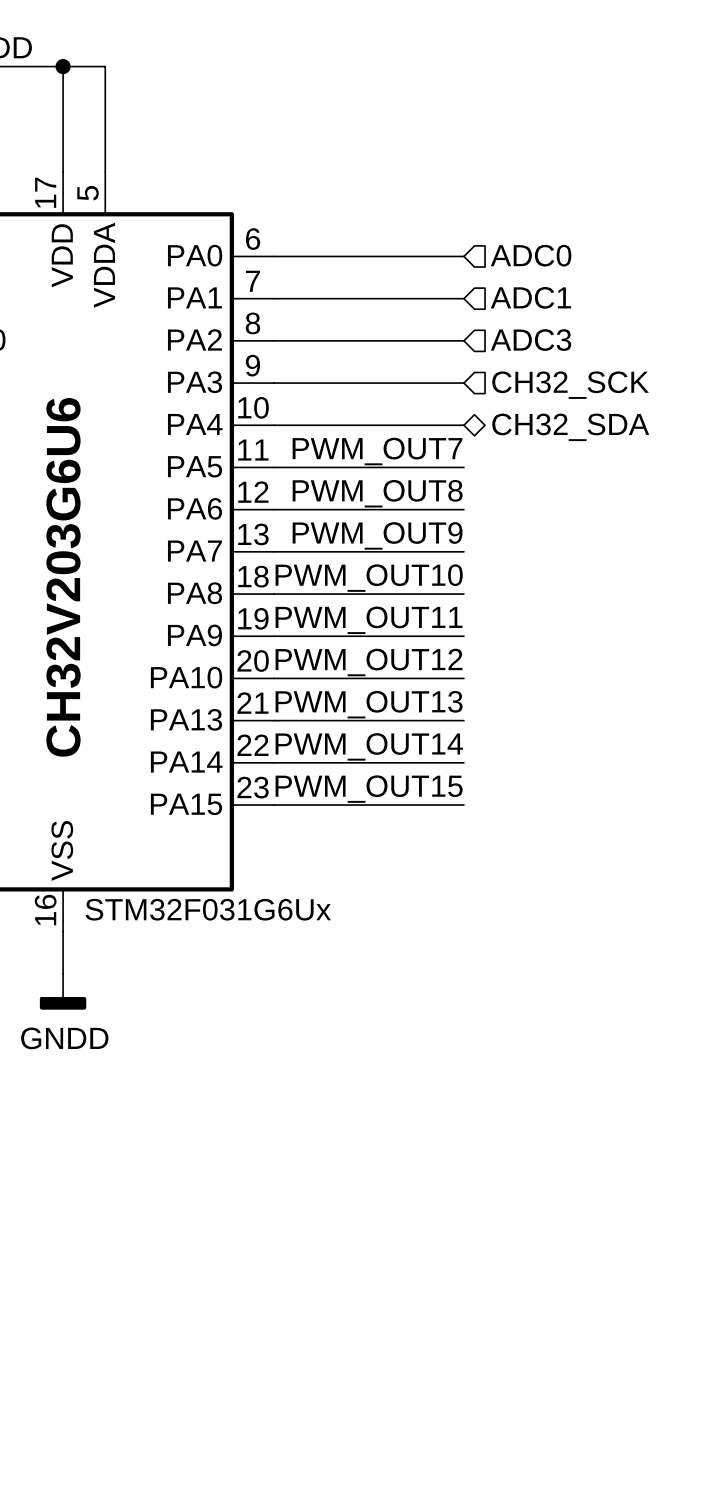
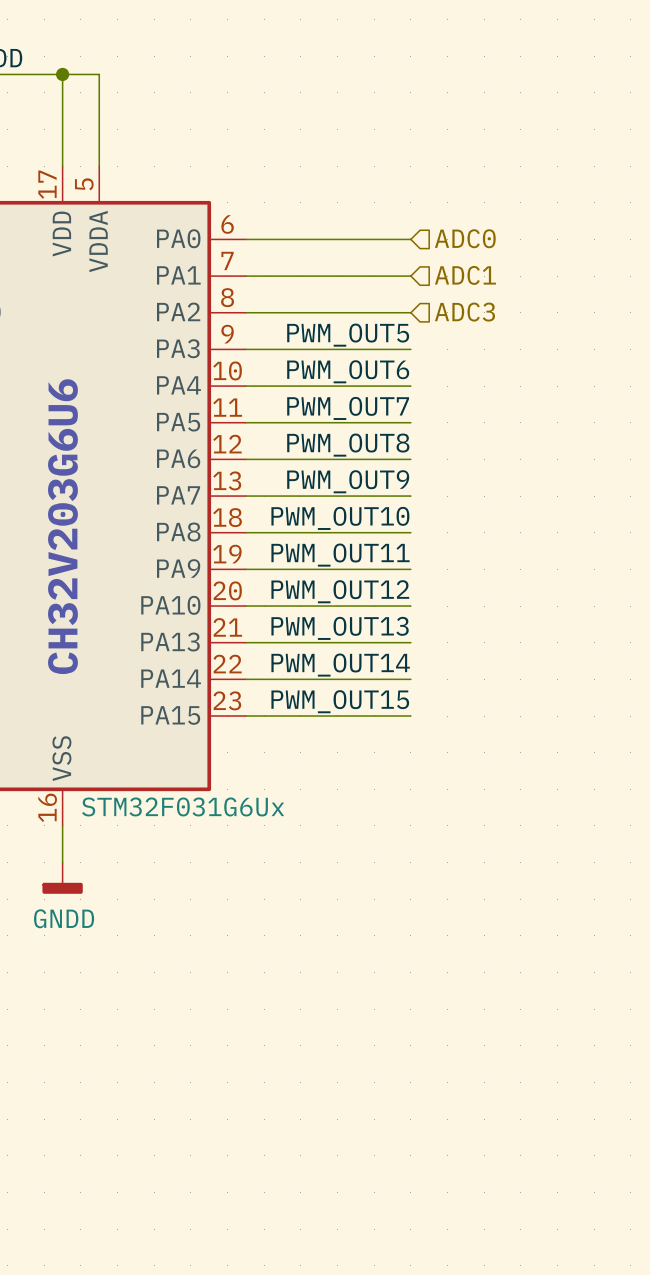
label: none -> PWM_OUT5 (348, 335)
hierarchical label: CH32_SCK (570, 385) -> none
label: none -> PWM_OUT6 (348, 371)
hierarchical label: CH32_SDA (570, 427) -> none

